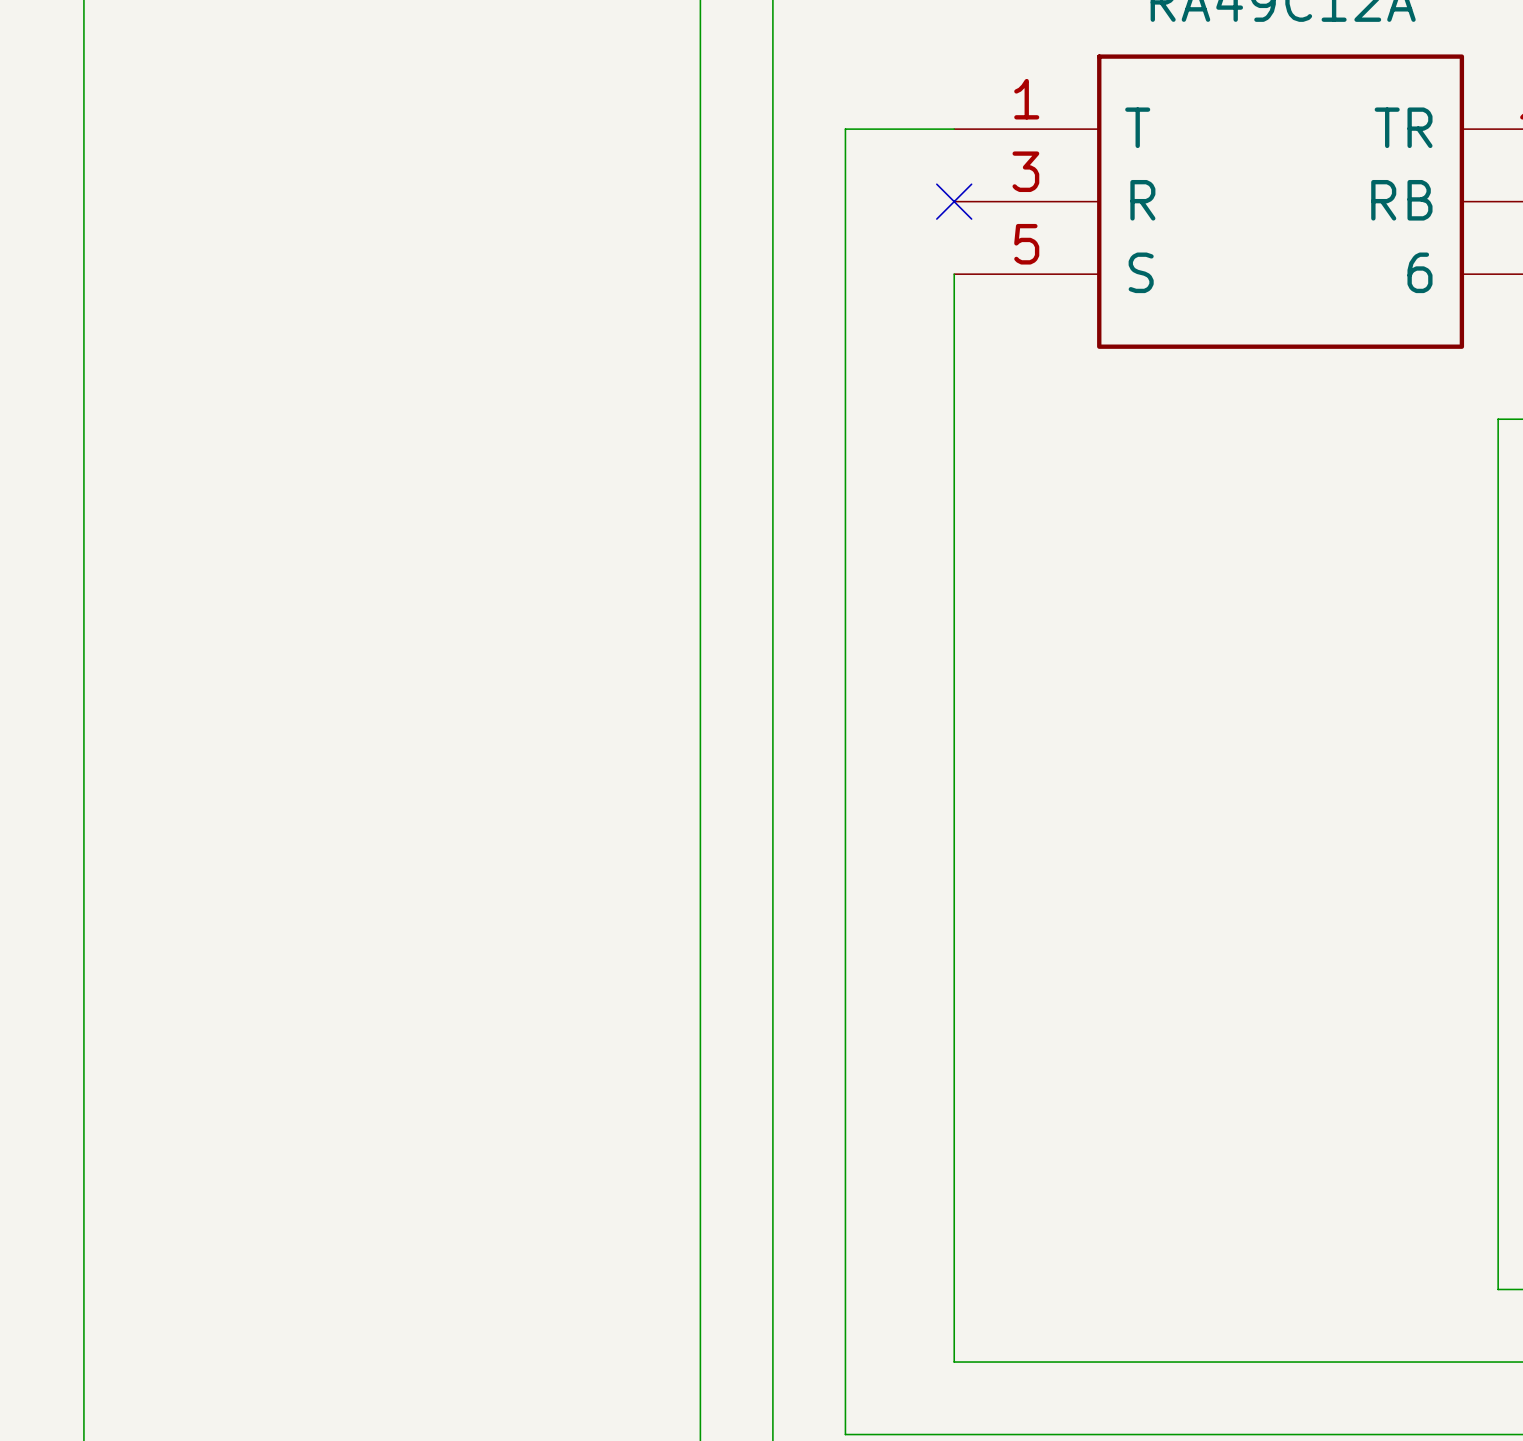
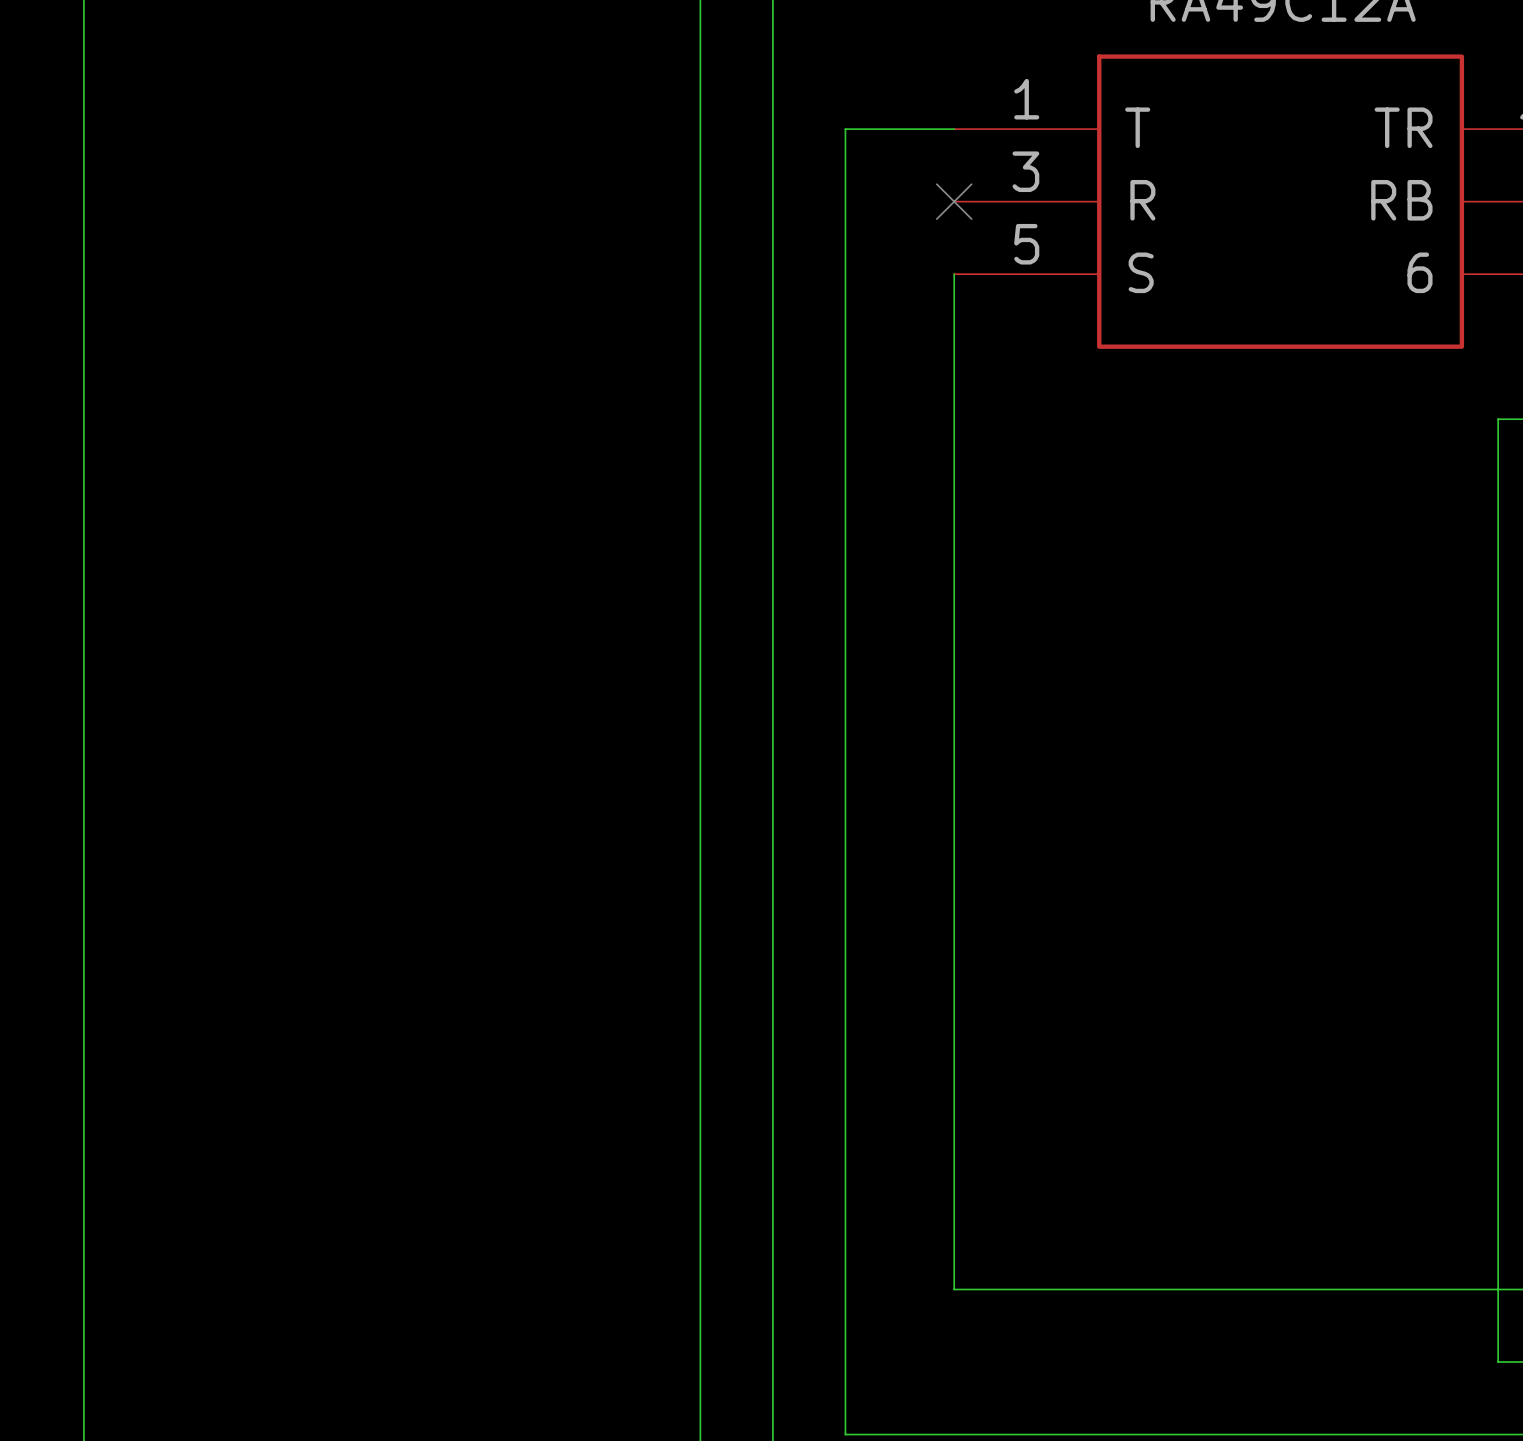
wire: (954, 1289) (954, 1362) (1498, 1362) -> (954, 1289) (1498, 1289) (1498, 1362)

